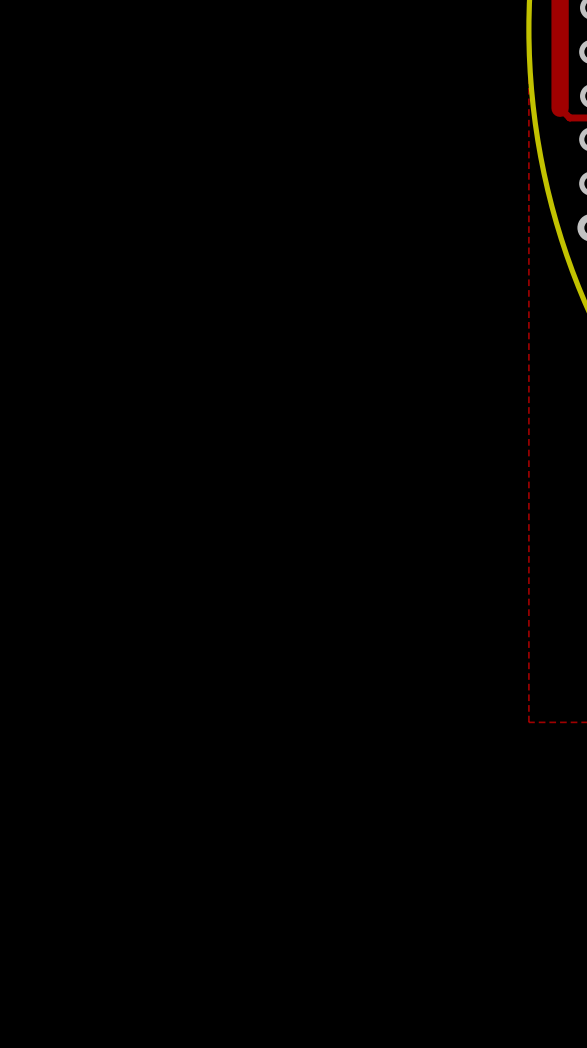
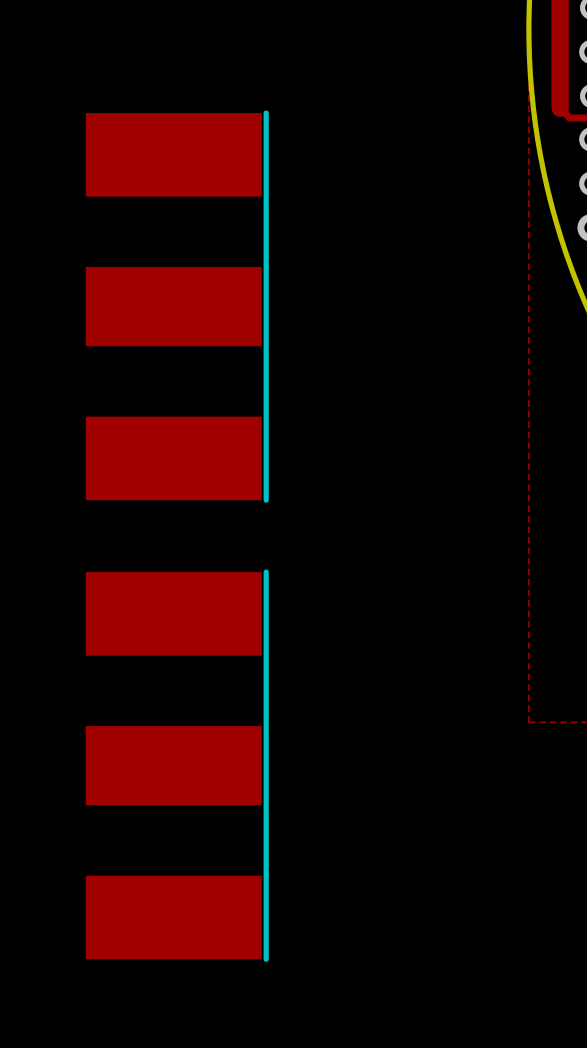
part: none -> (177, 306)
part: none -> (177, 765)

